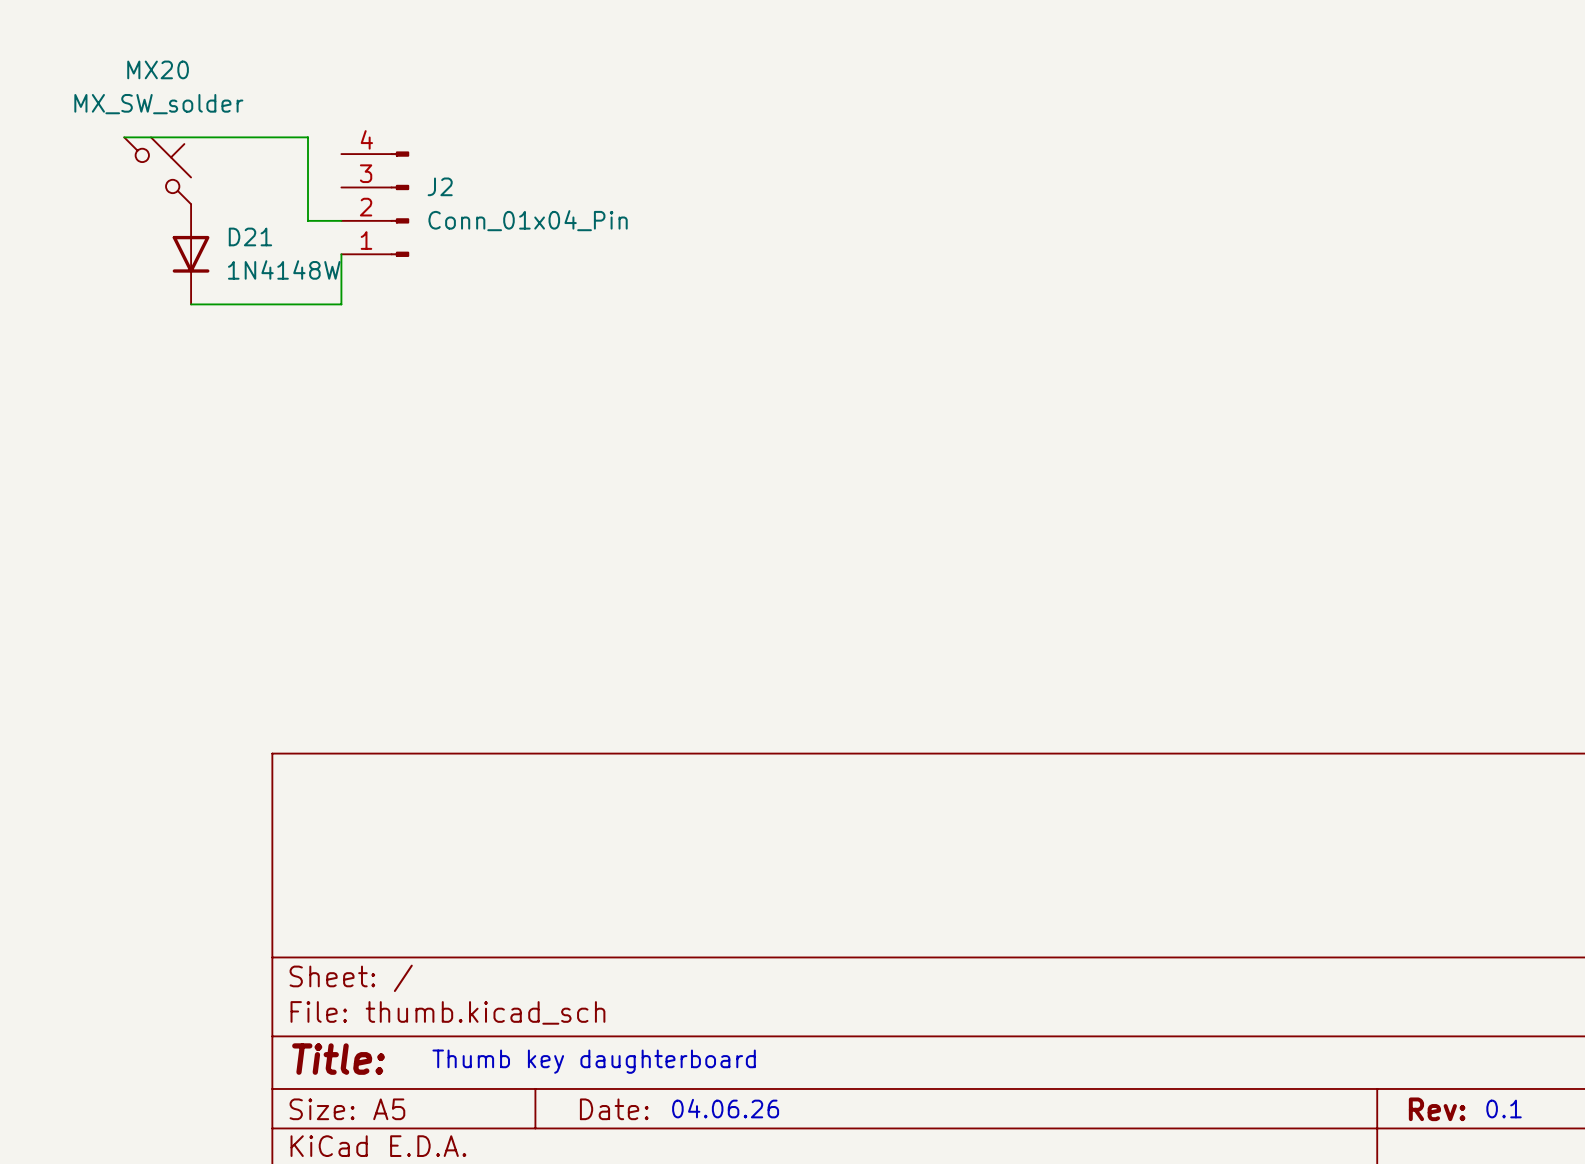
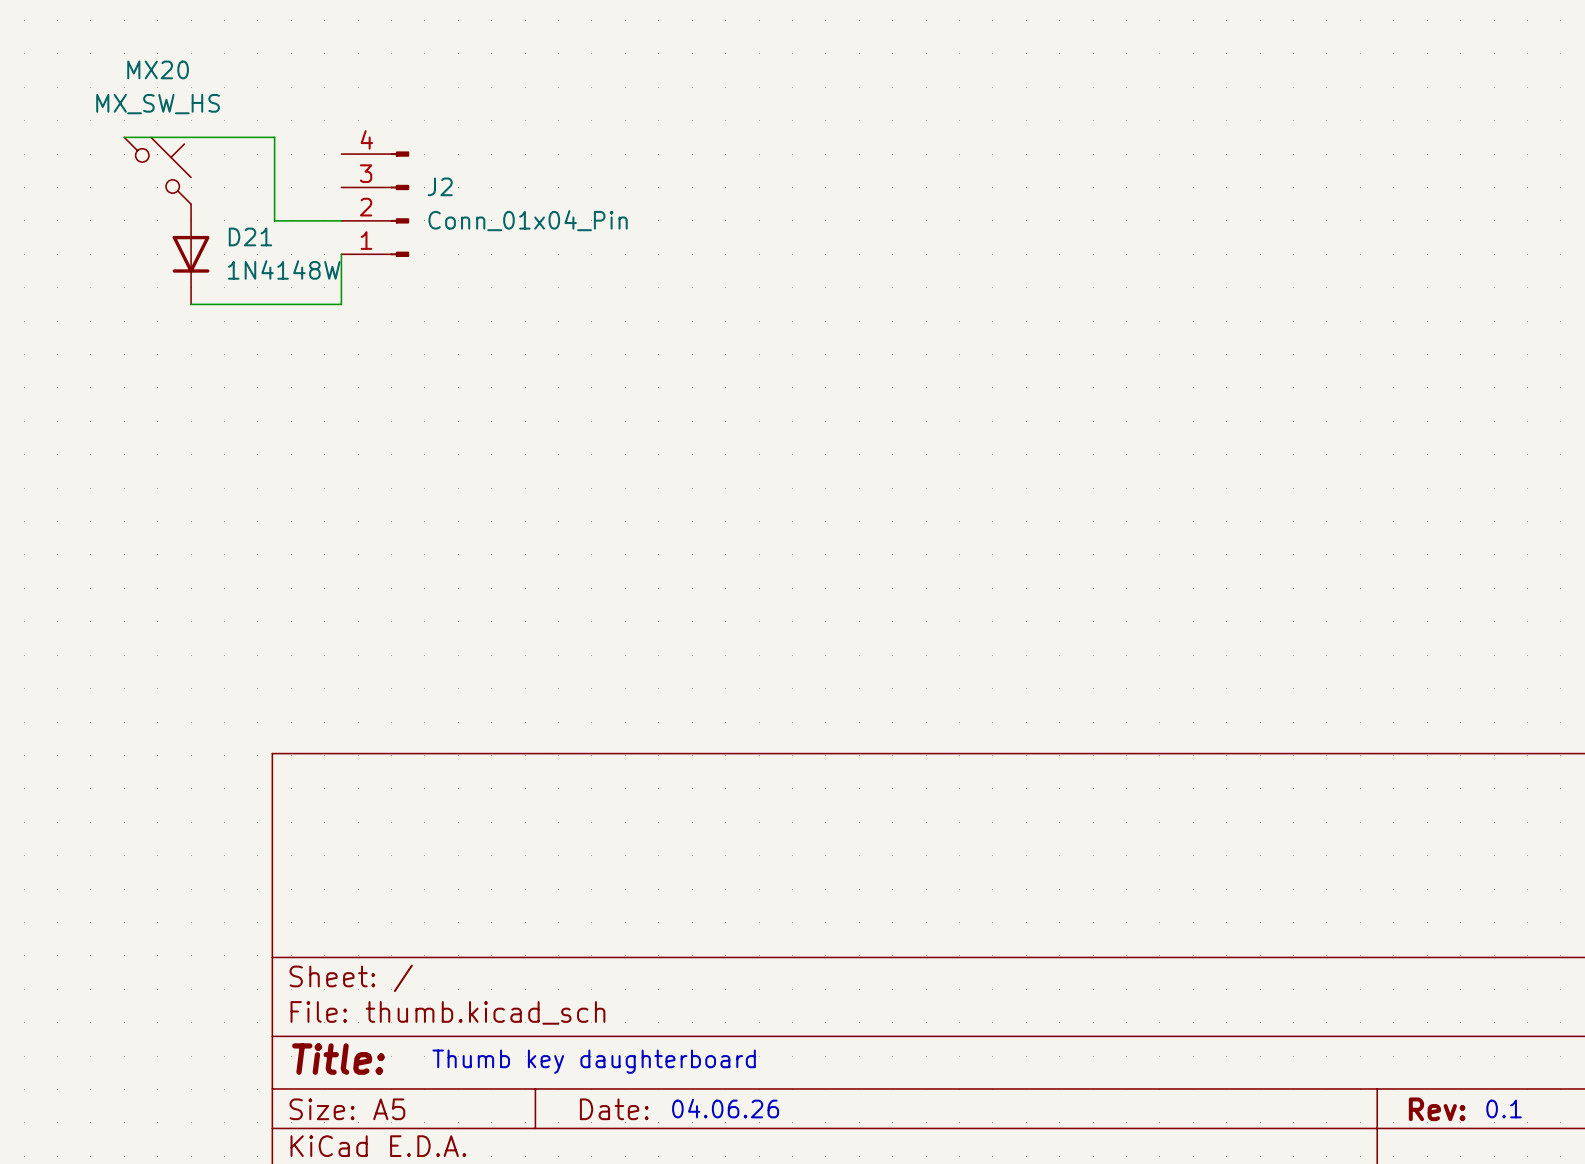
MX20 value: MX_SW_solder (158, 104) -> MX_SW_HS (158, 104)
wire: (274, 137) (308, 137) (308, 220) -> (274, 137) (274, 220) (308, 220)

